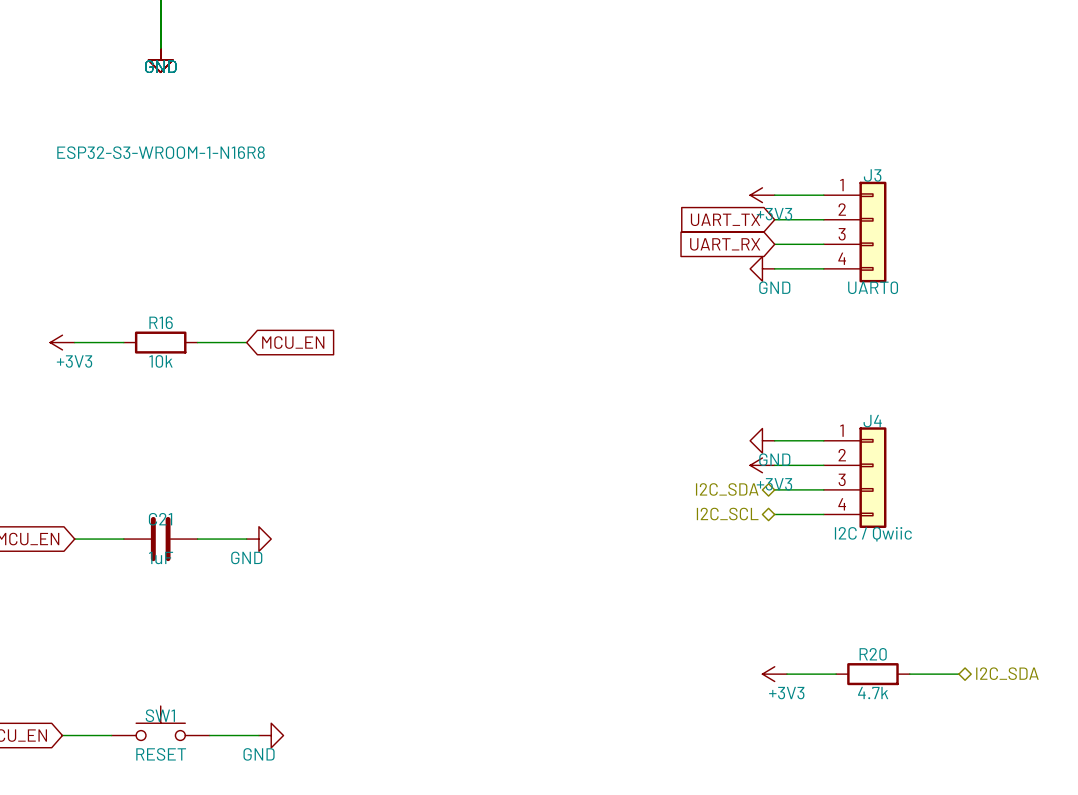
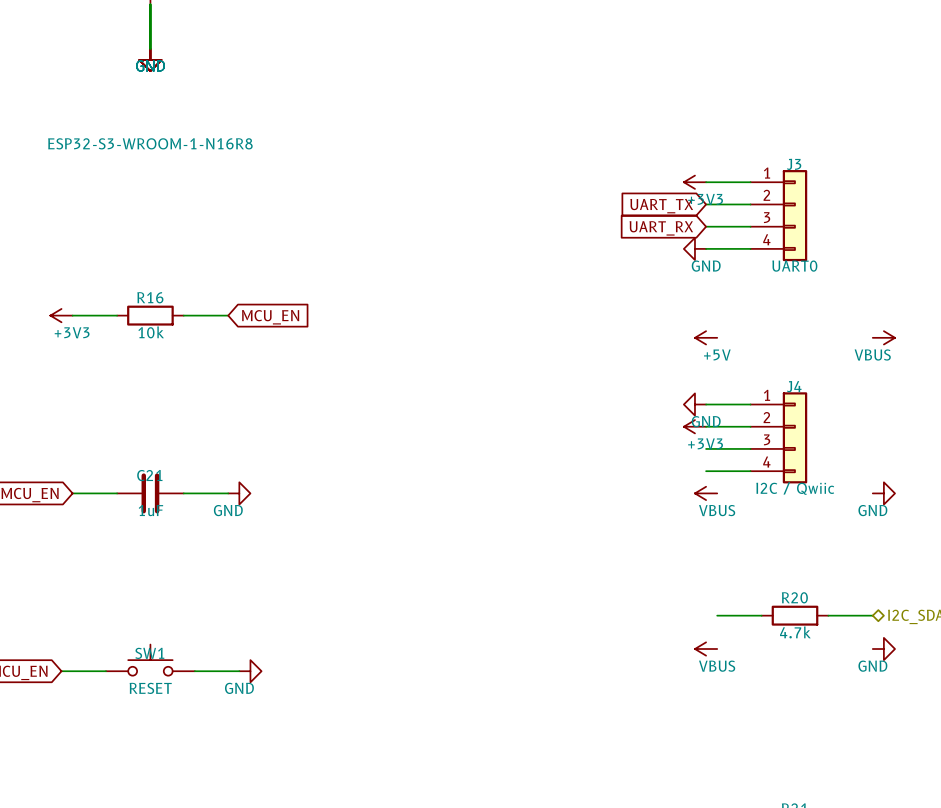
power symbol: none -> +5V (706, 337)
power symbol: none -> VBUS (883, 337)
hierarchical label: I2C_SDA (727, 489) -> none
hierarchical label: I2C_SCL (727, 514) -> none
power symbol: none -> VBUS (706, 493)
power symbol: none -> GND (883, 493)
power symbol: +3V3 (774, 674) -> none
power symbol: none -> VBUS (706, 649)
power symbol: none -> GND (883, 649)

